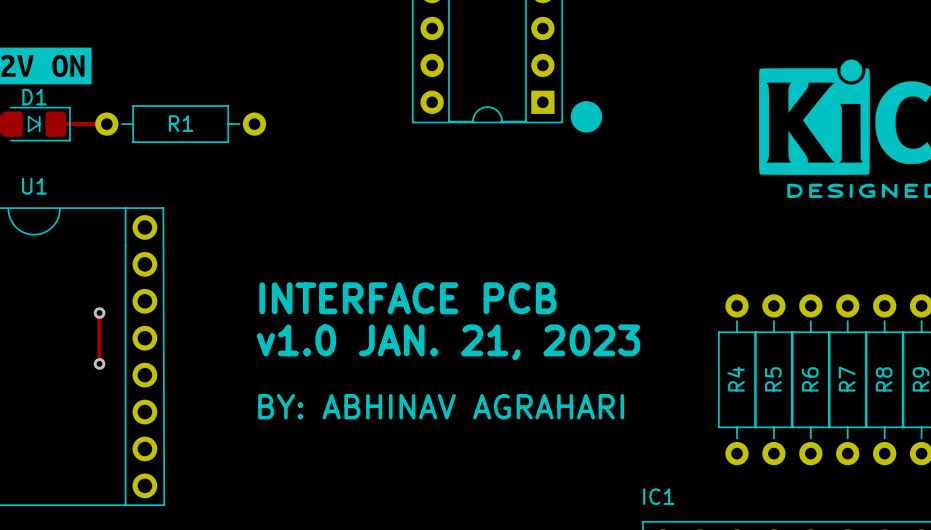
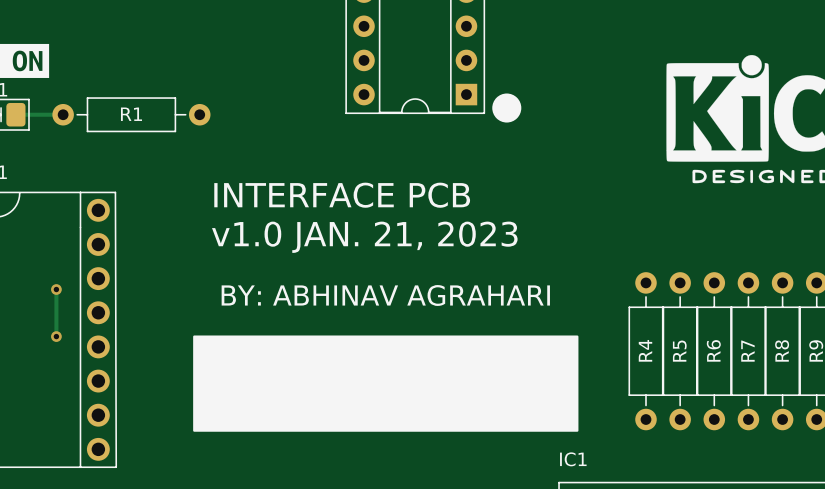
text position: INTERFACE PCB (408, 298) -> INTERFACE PCB (342, 195)
text position: v1.0 JAN. 21, 2023 (448, 342) -> v1.0 JAN. 21, 2023 (364, 237)
drawing: none -> [193, 335, 579, 432]
text position: BY: ABHINAV AGRAHARI (441, 406) -> BY: ABHINAV AGRAHARI (385, 295)

